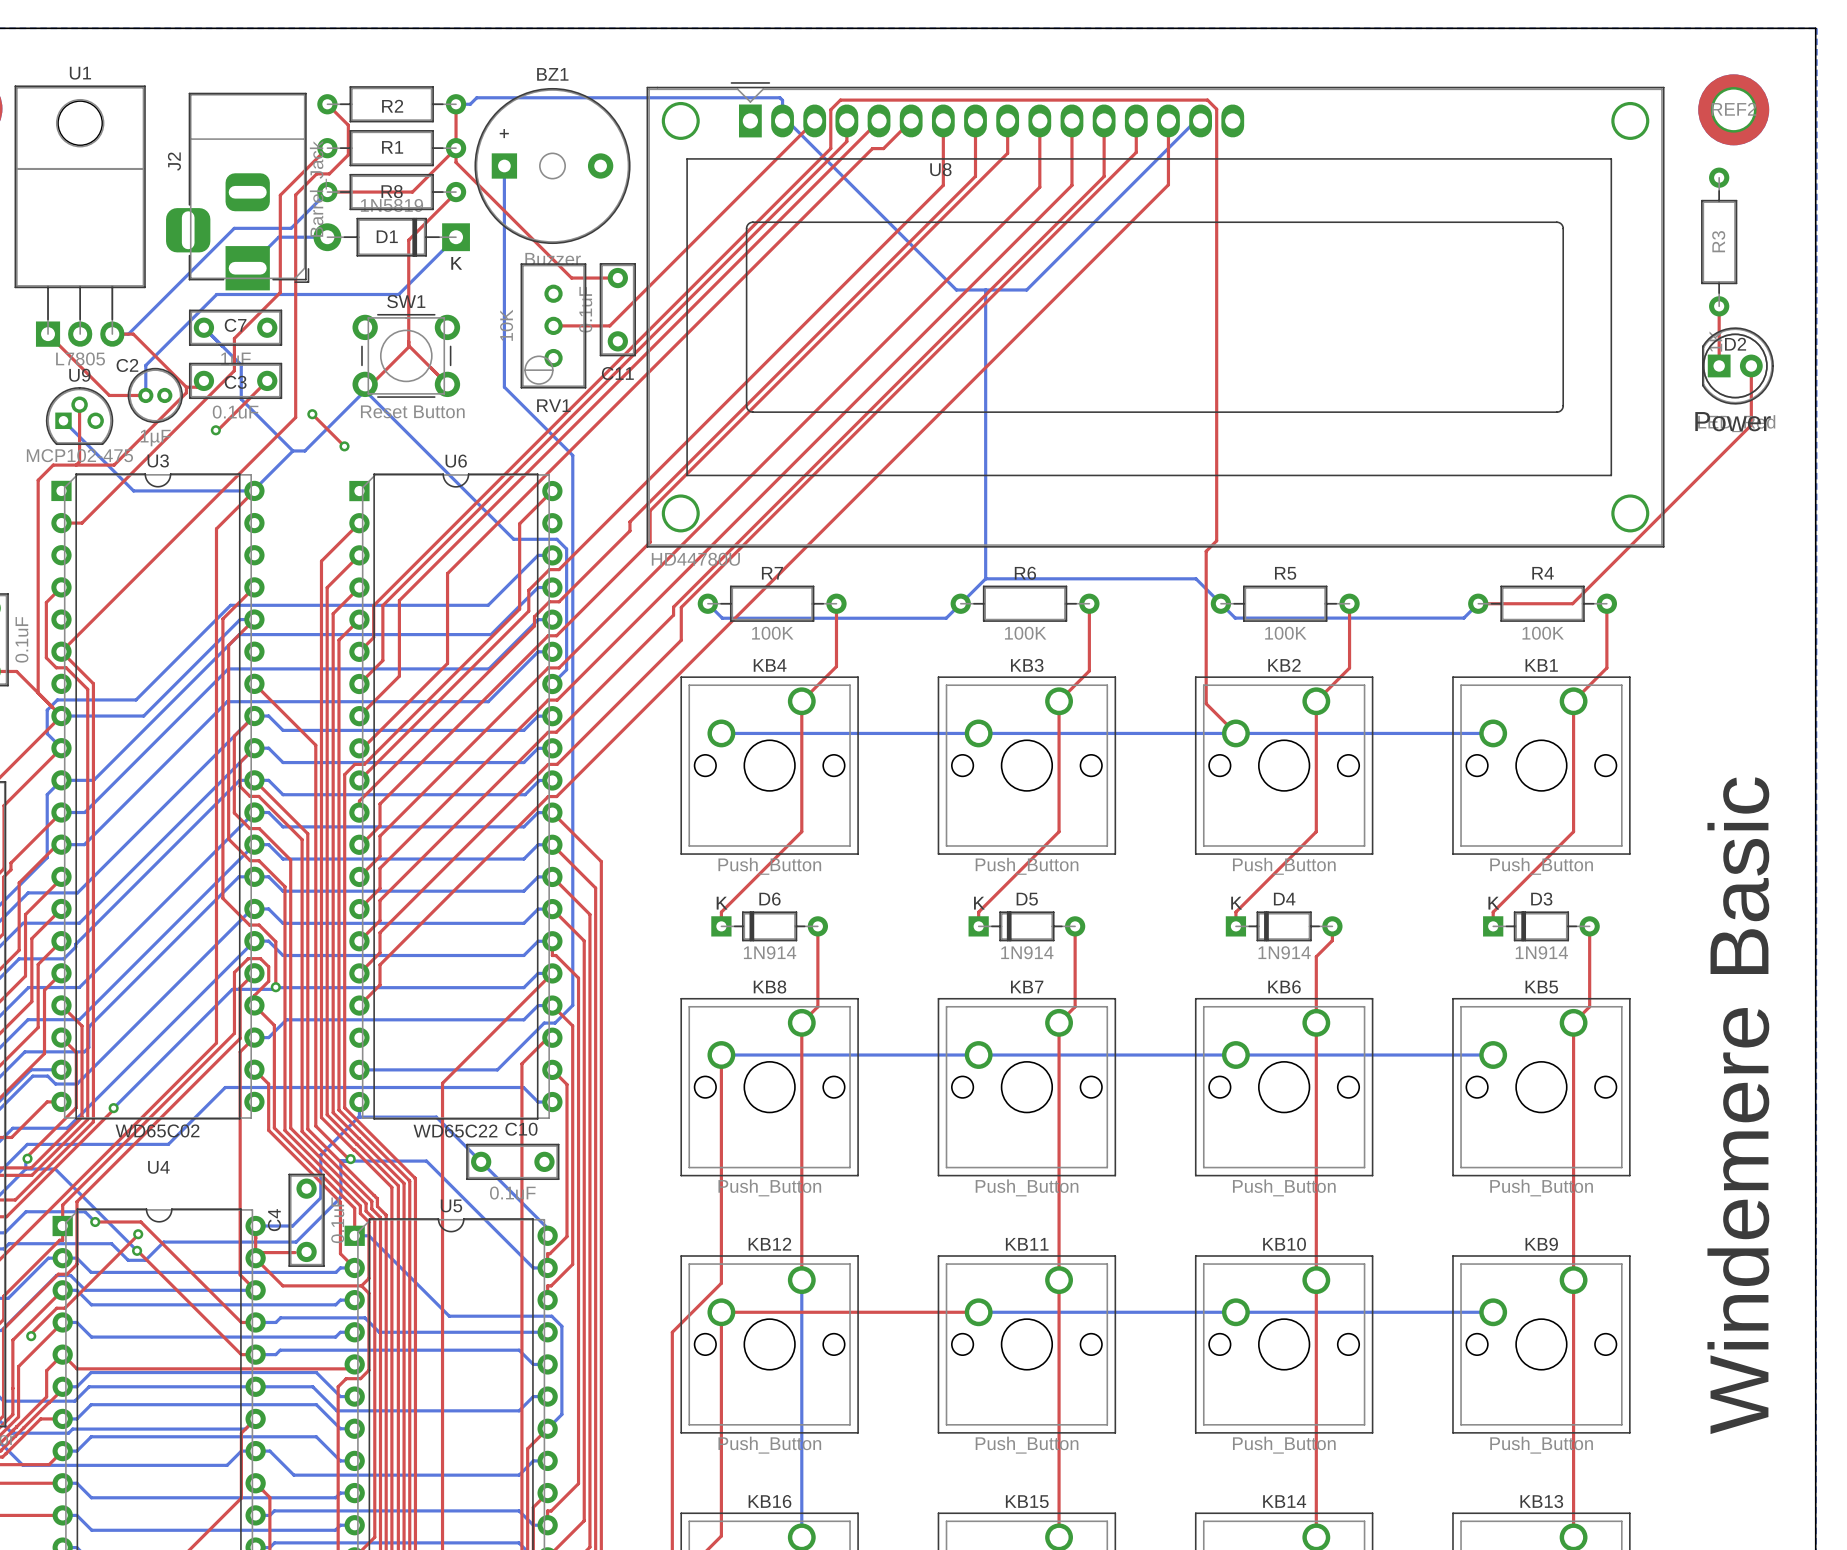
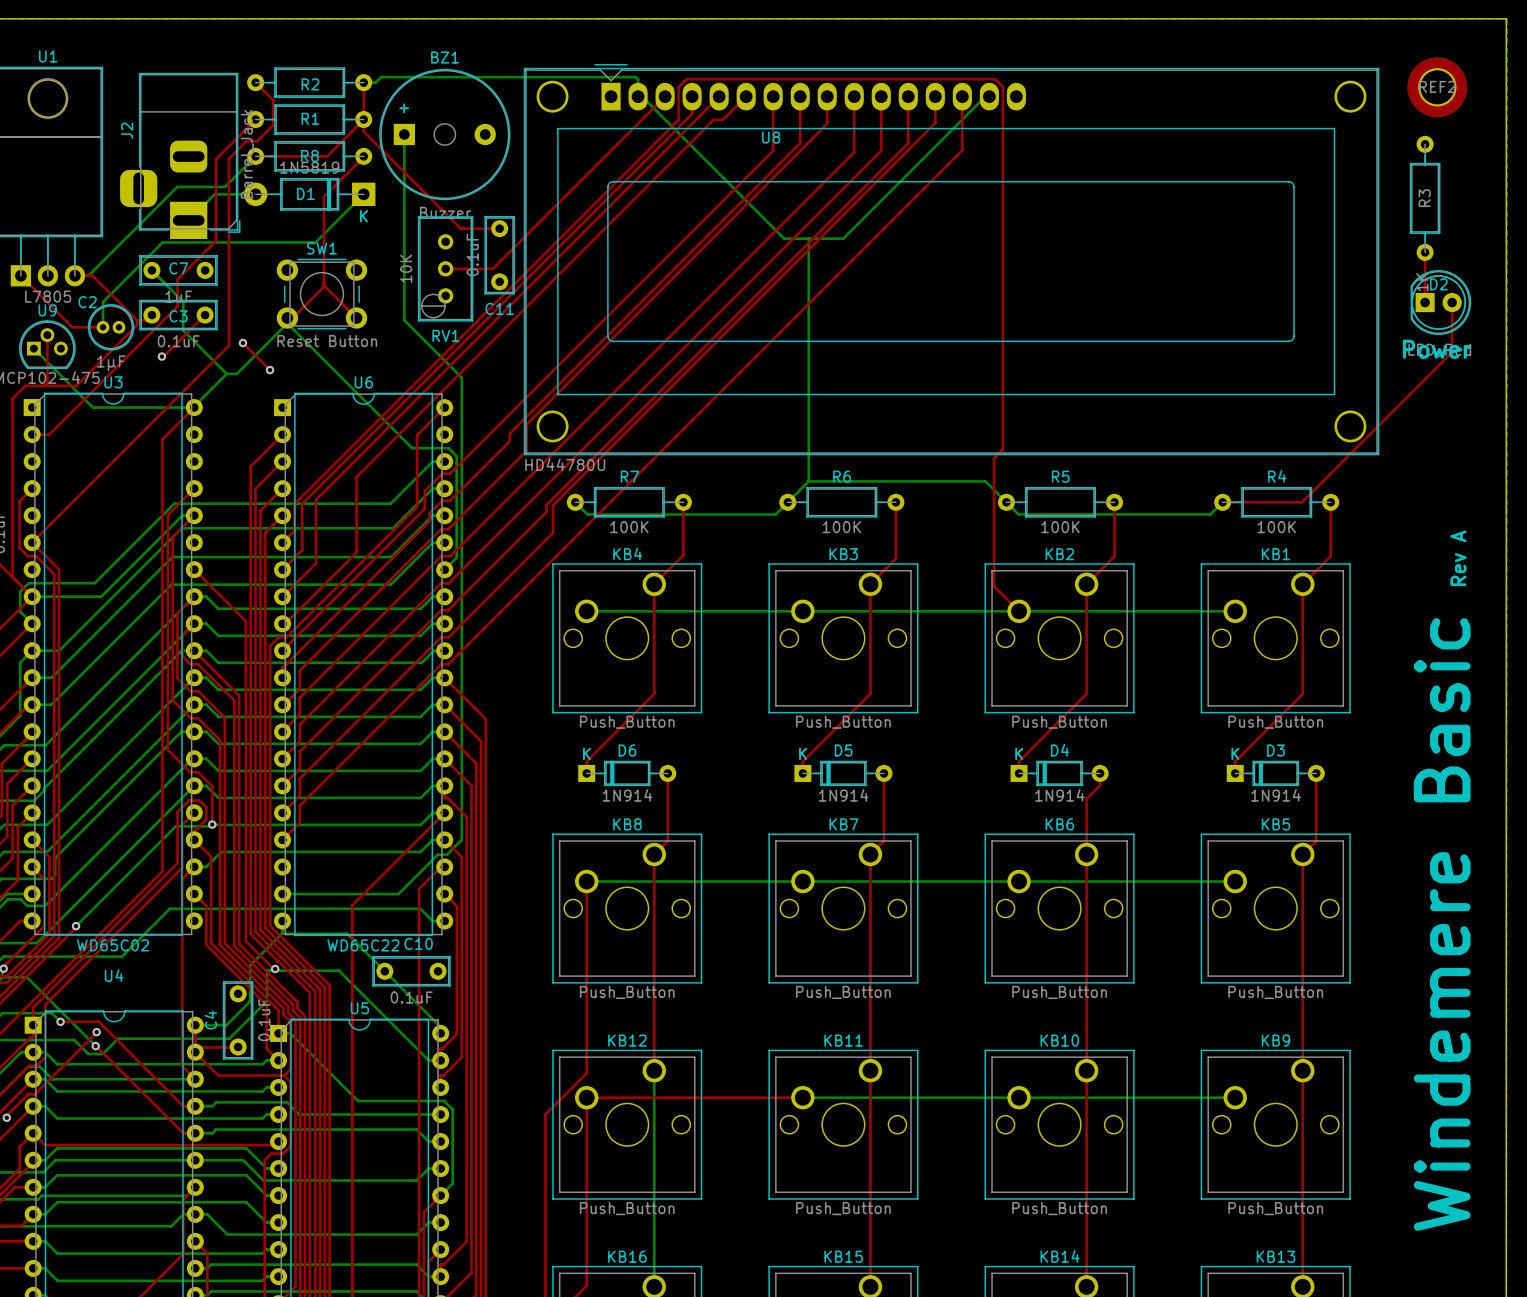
text: none -> Rev A (1458, 558)

